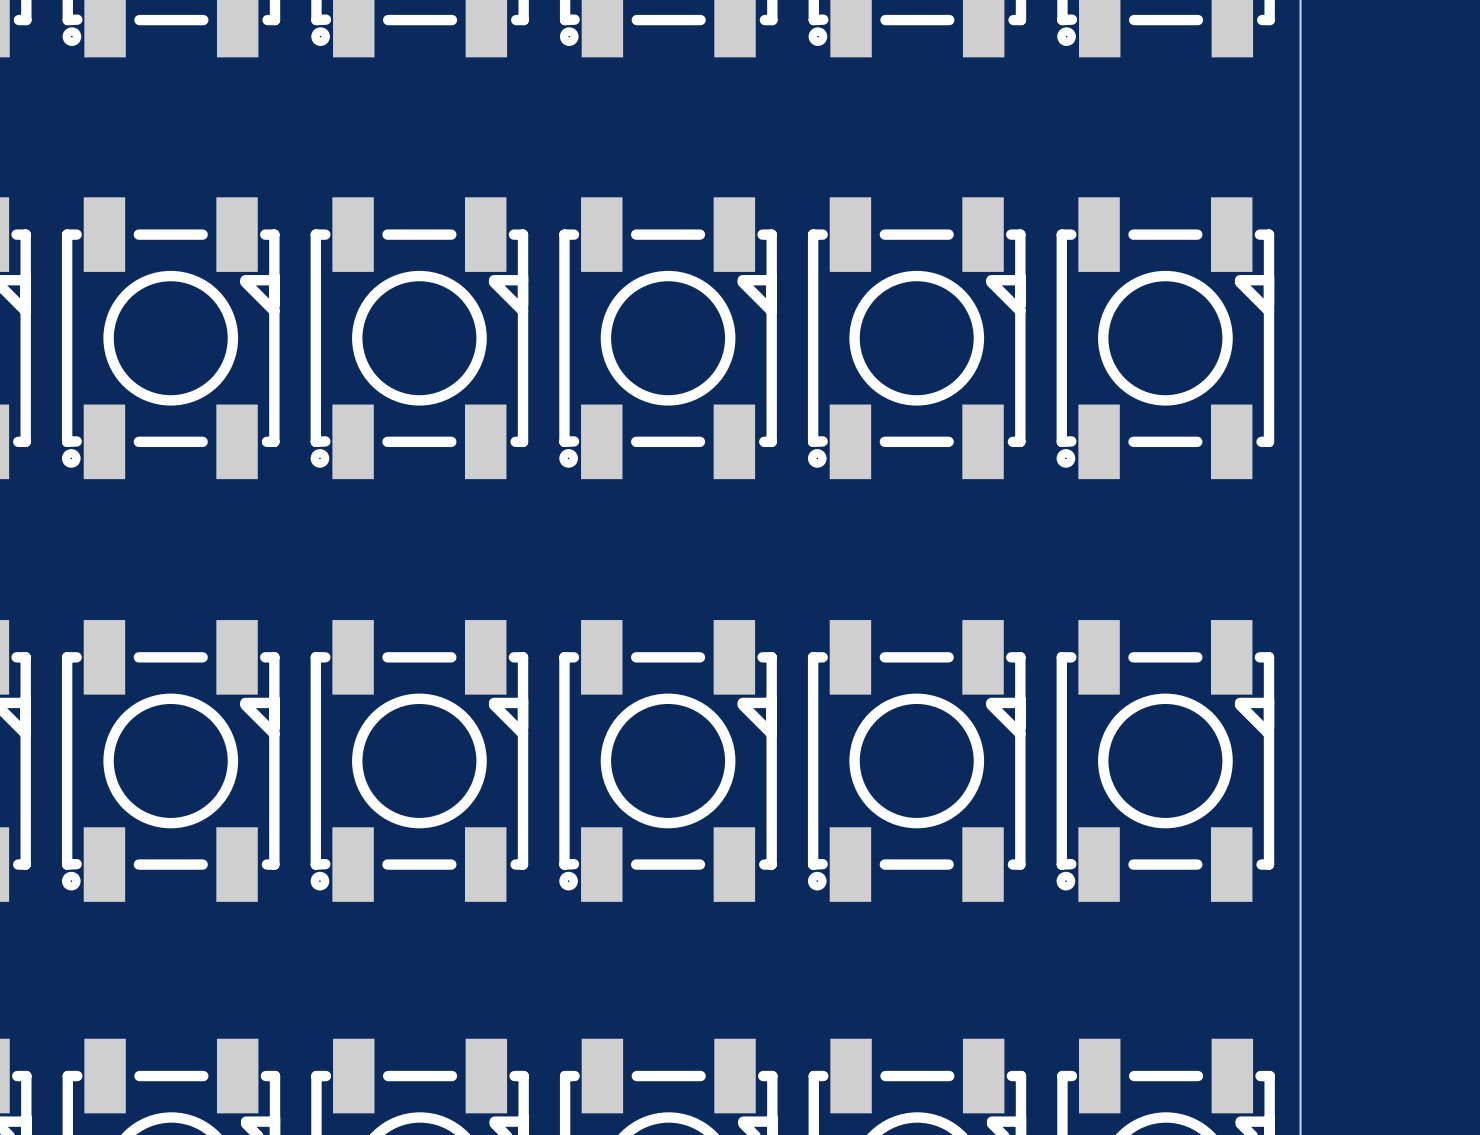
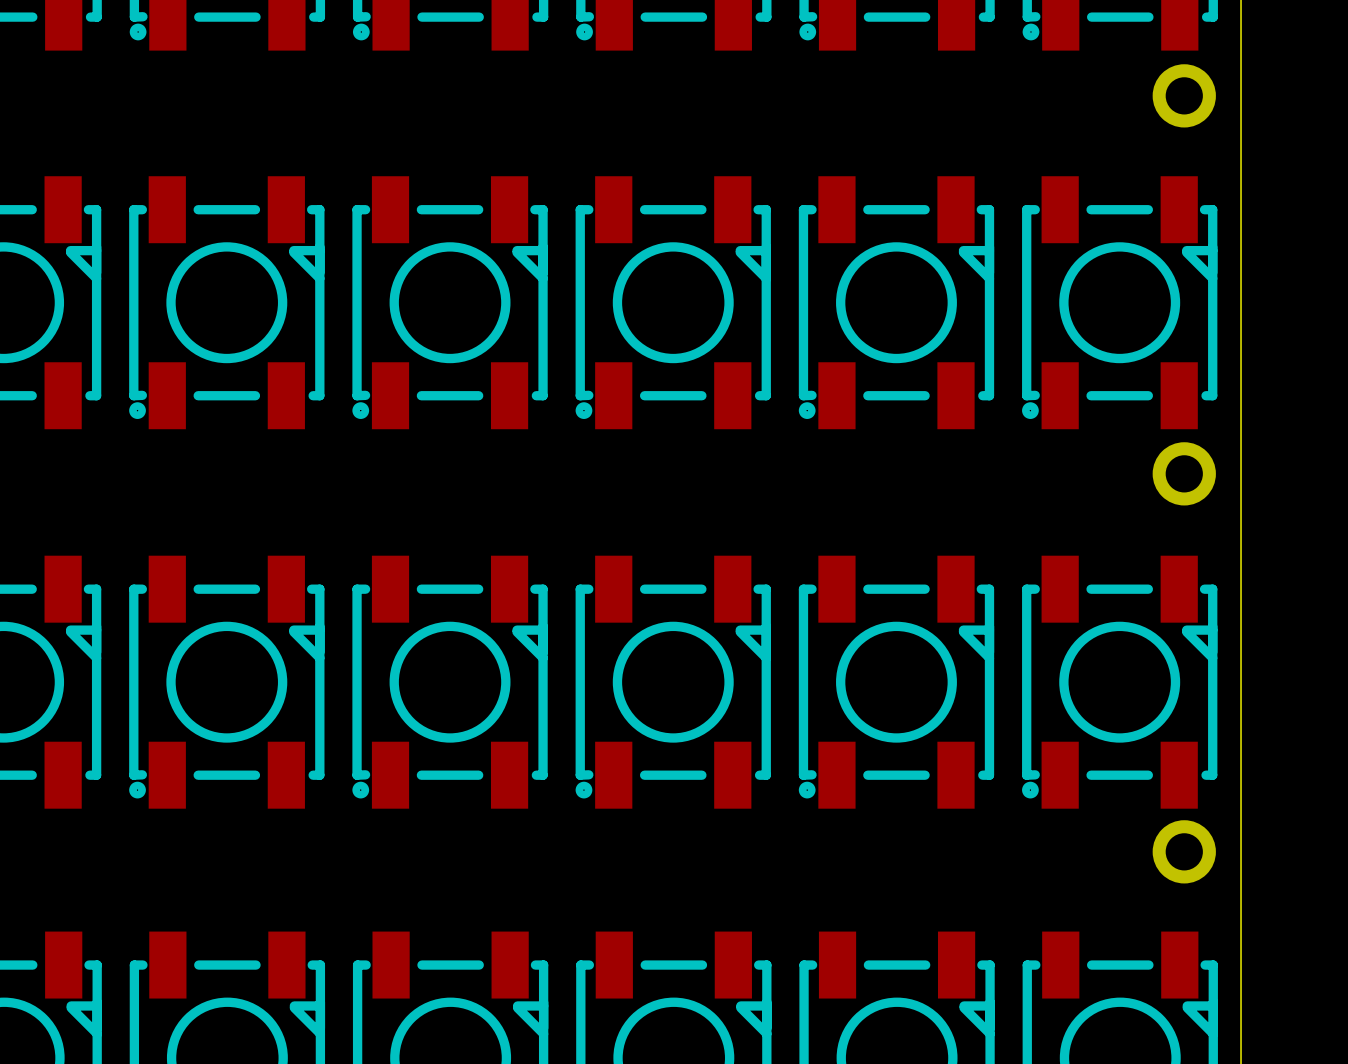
part: none -> (1184, 95)
part: none -> (1184, 473)
part: none -> (1184, 851)

